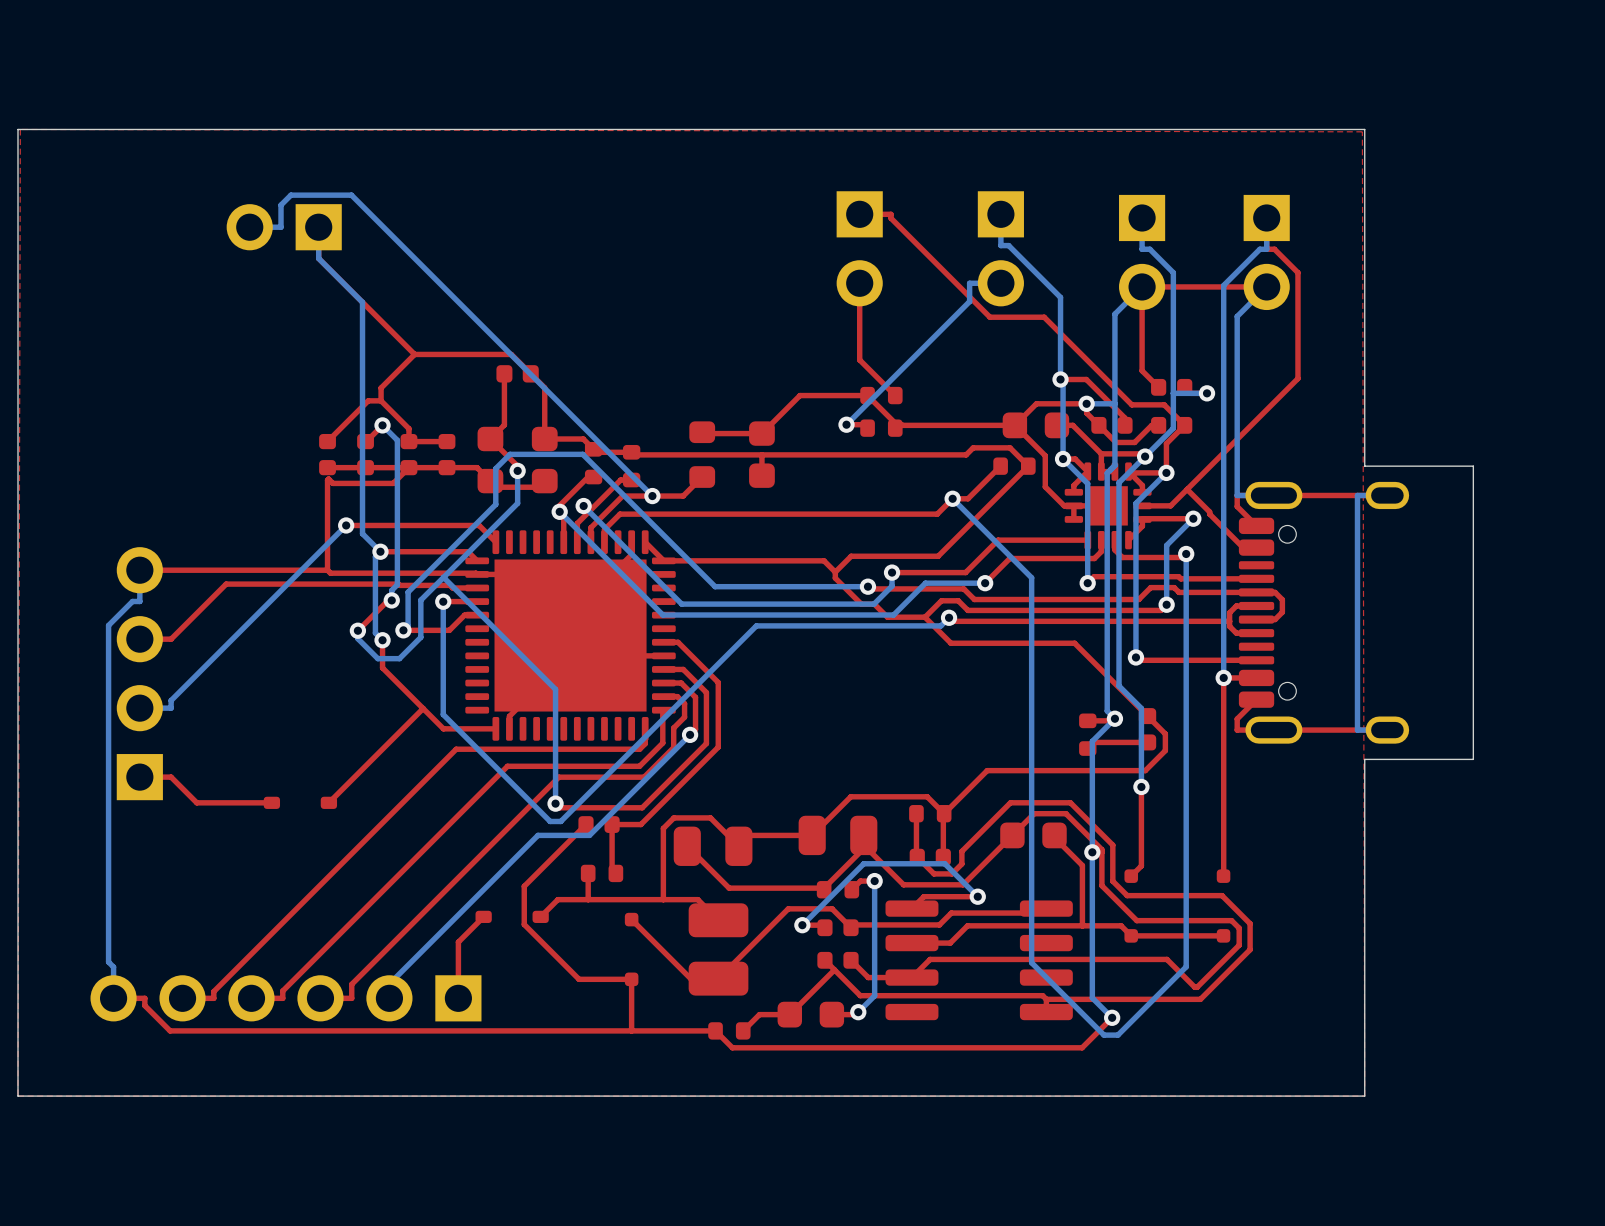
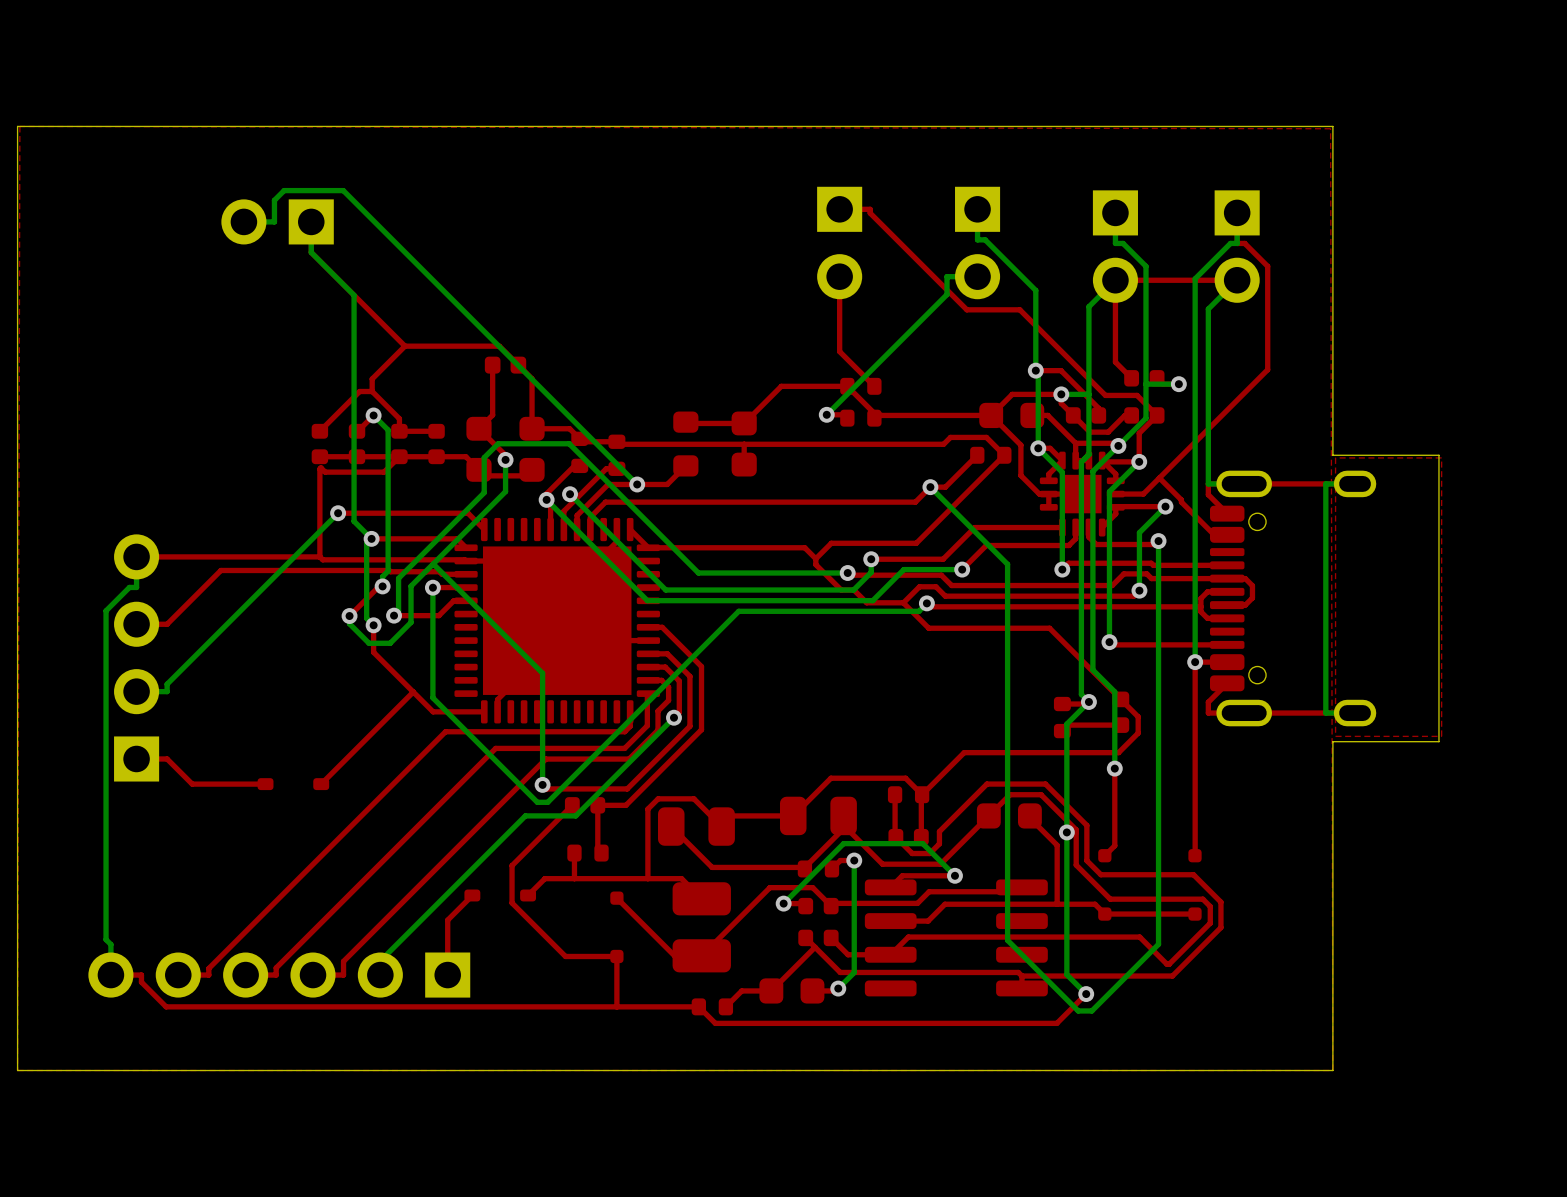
top zone outline: none -> (1441, 457) (1335, 457) (1335, 736) (1441, 736) (1441, 457)

